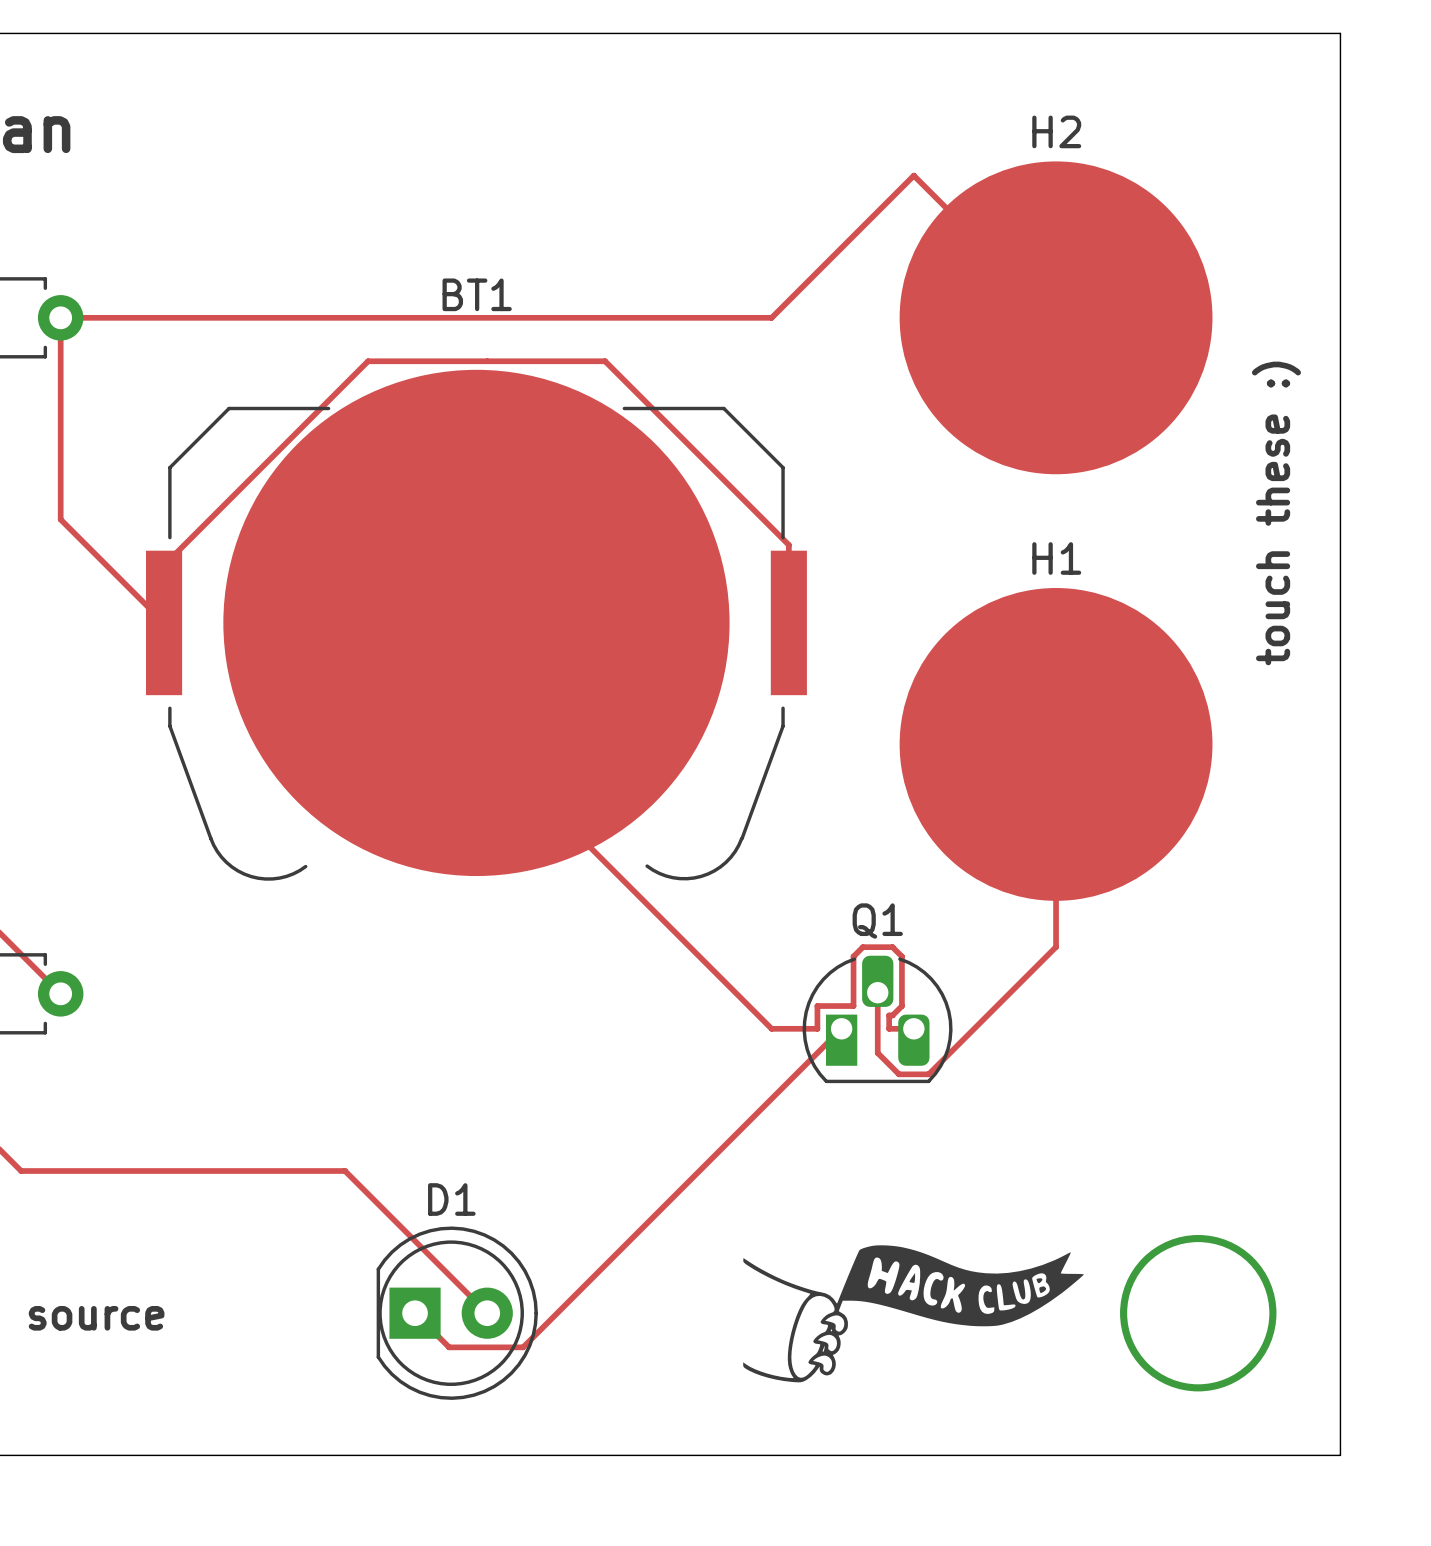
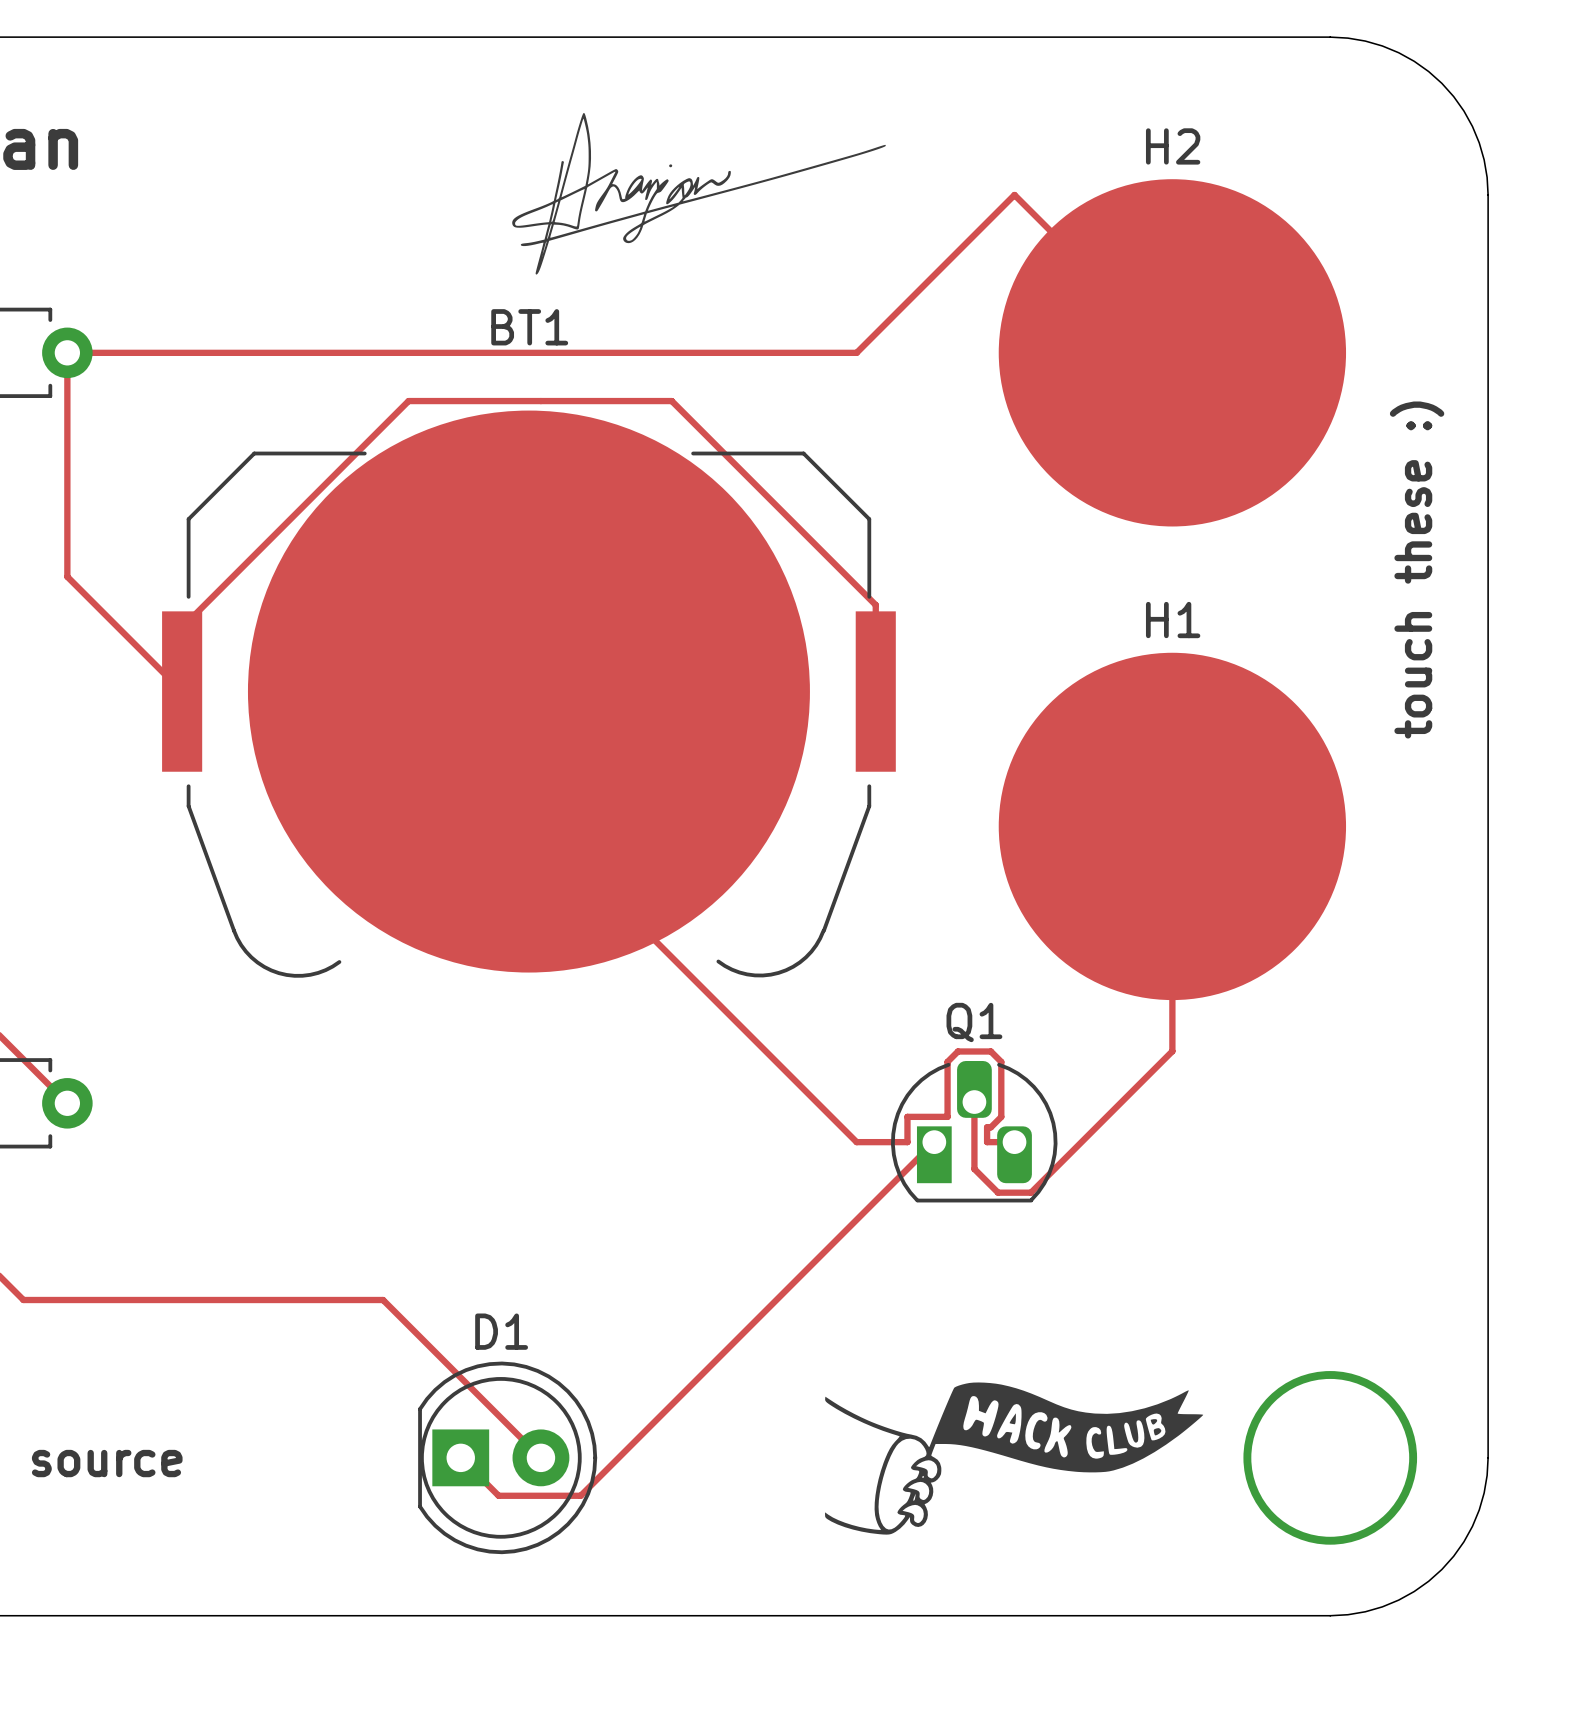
board edge: (1198, 33) (1340, 33) (1340, 175) -> (1330, 37) (1365, 41) (1398, 52) (1414, 61) (1441, 83) (1463, 110) (1479, 142) (1487, 177) (1488, 194)
drawing: none -> [512, 112, 886, 275]
board edge: (1340, 1313) (1340, 1455) (1198, 1455) -> (1488, 1457) (1484, 1492) (1479, 1510) (1463, 1541) (1441, 1569) (1414, 1591) (1398, 1600) (1365, 1611) (1330, 1615)

